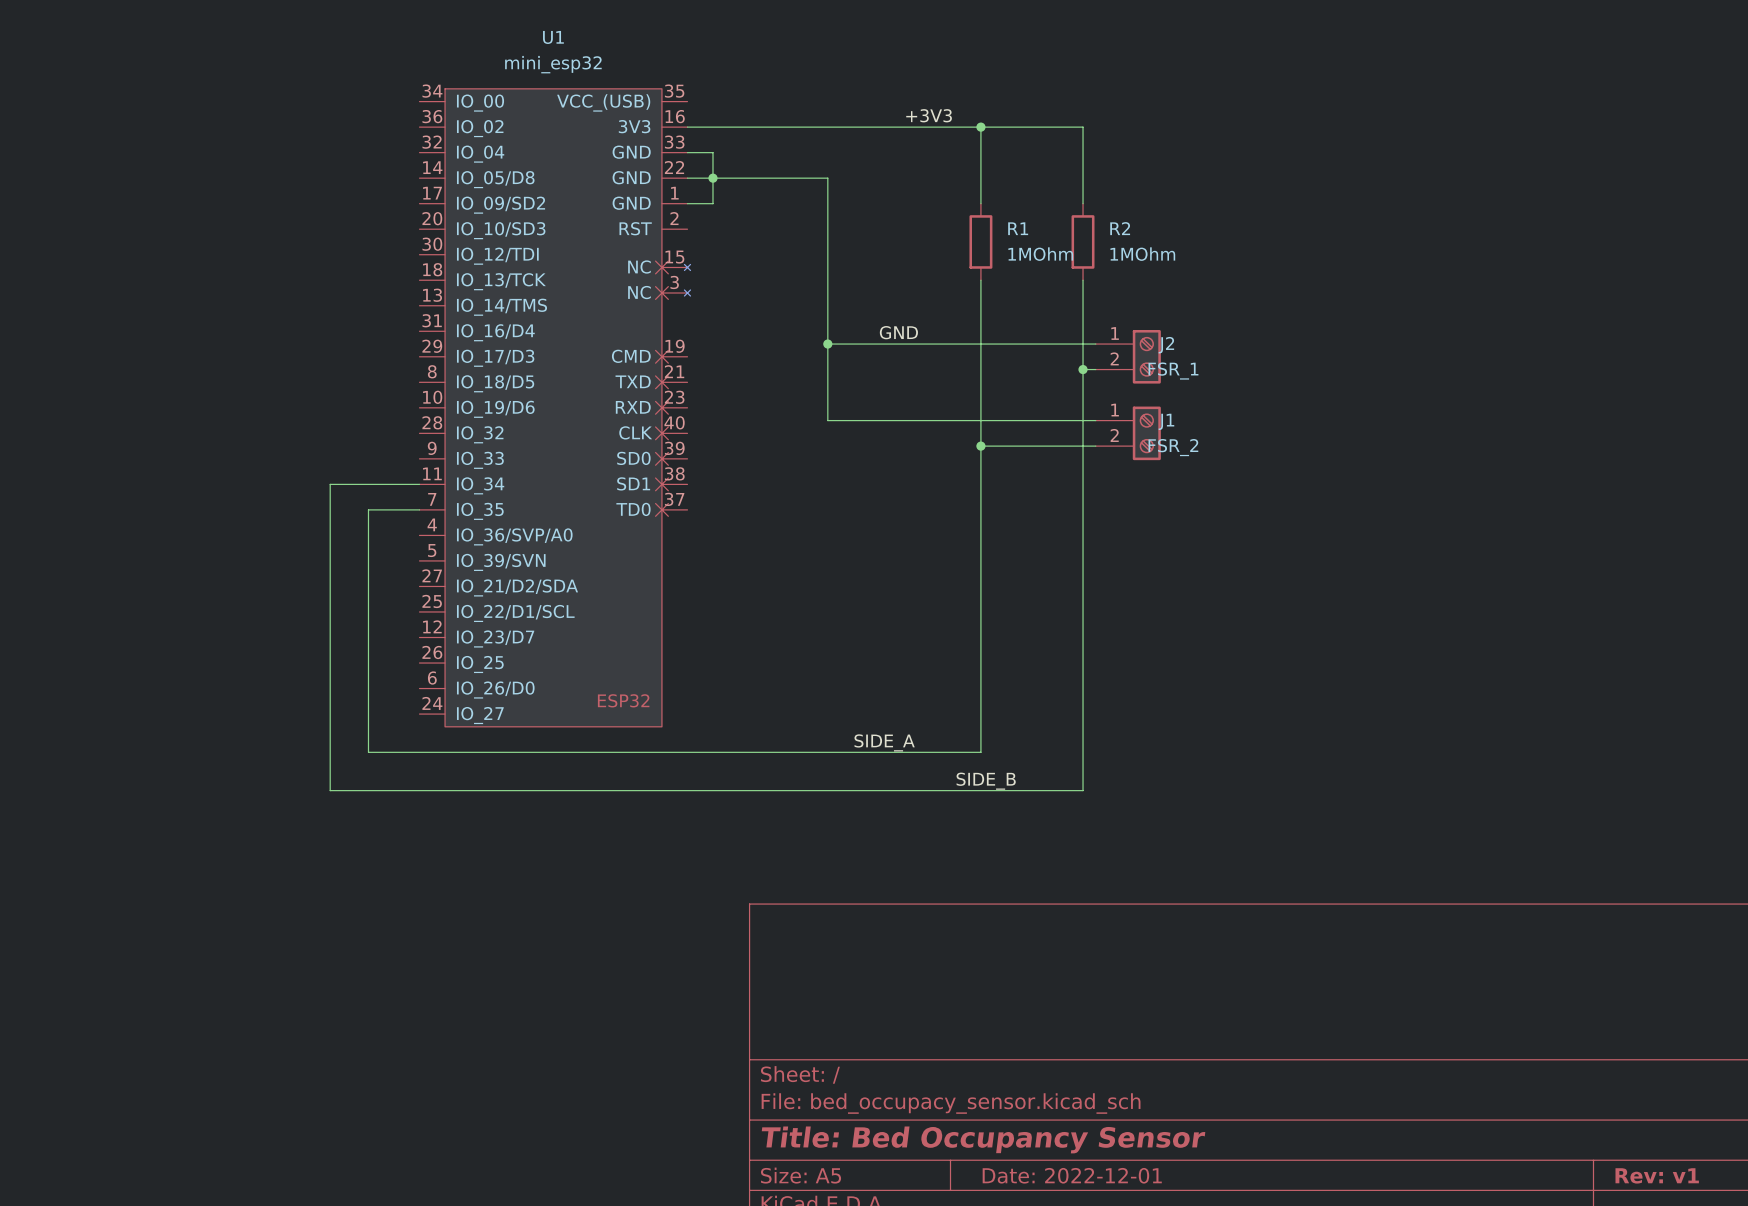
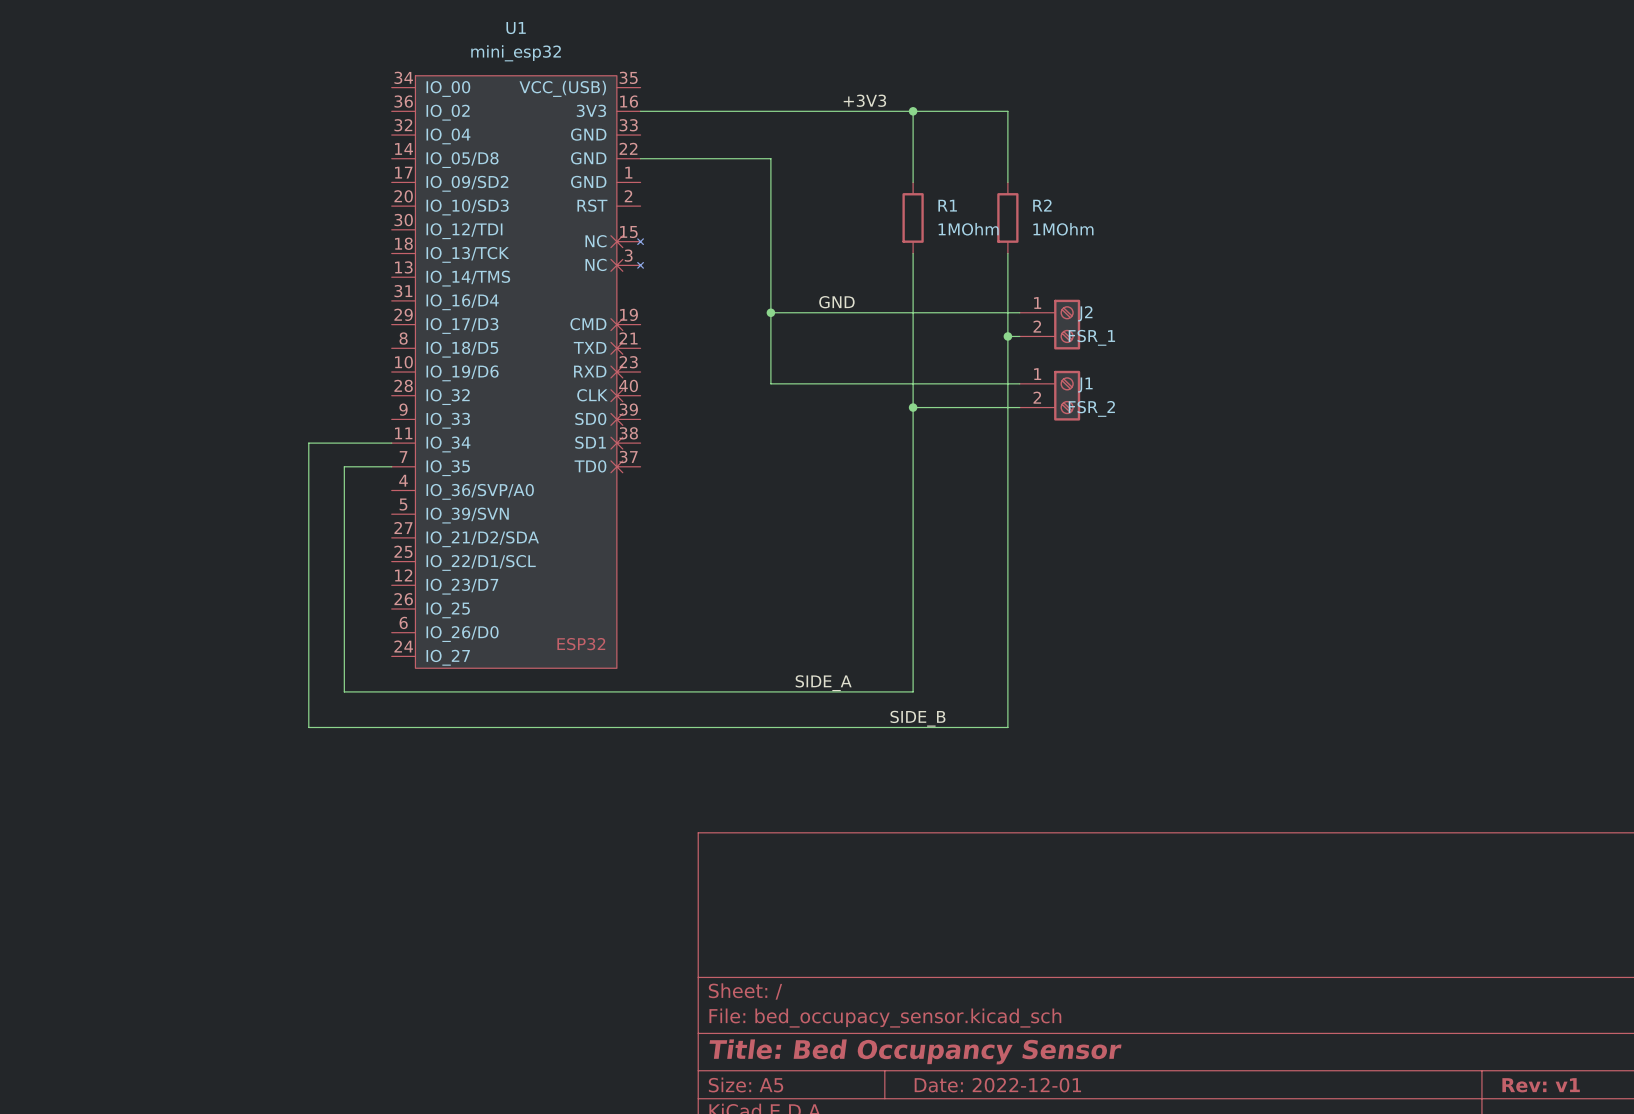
wire: (687, 152) (712, 152) (712, 203) (687, 203) -> none
junction: (712, 178) -> none

